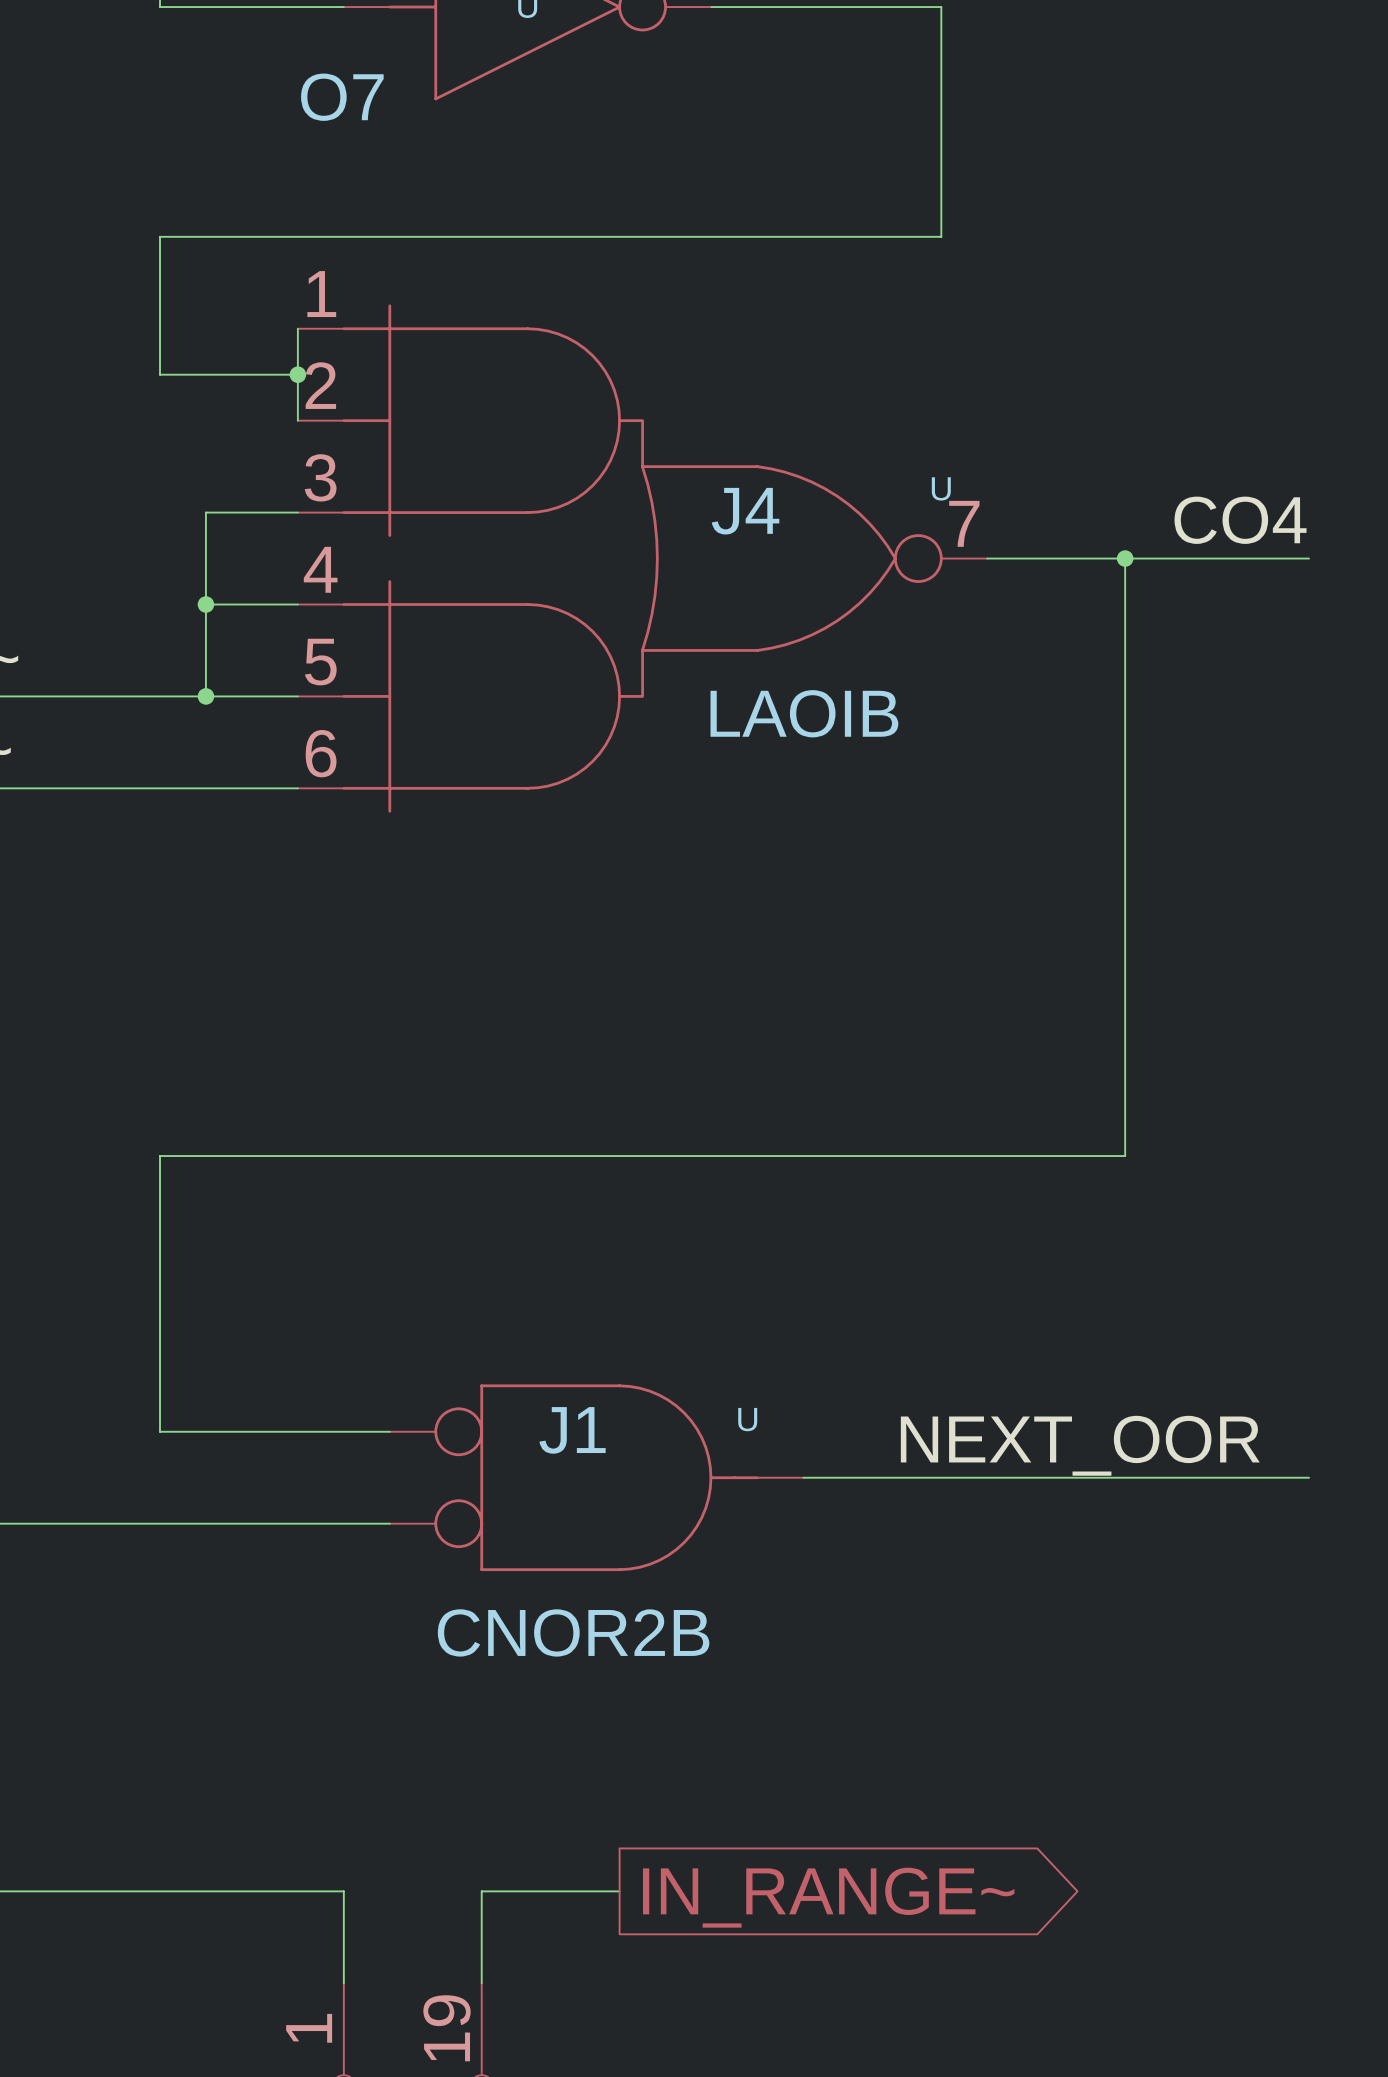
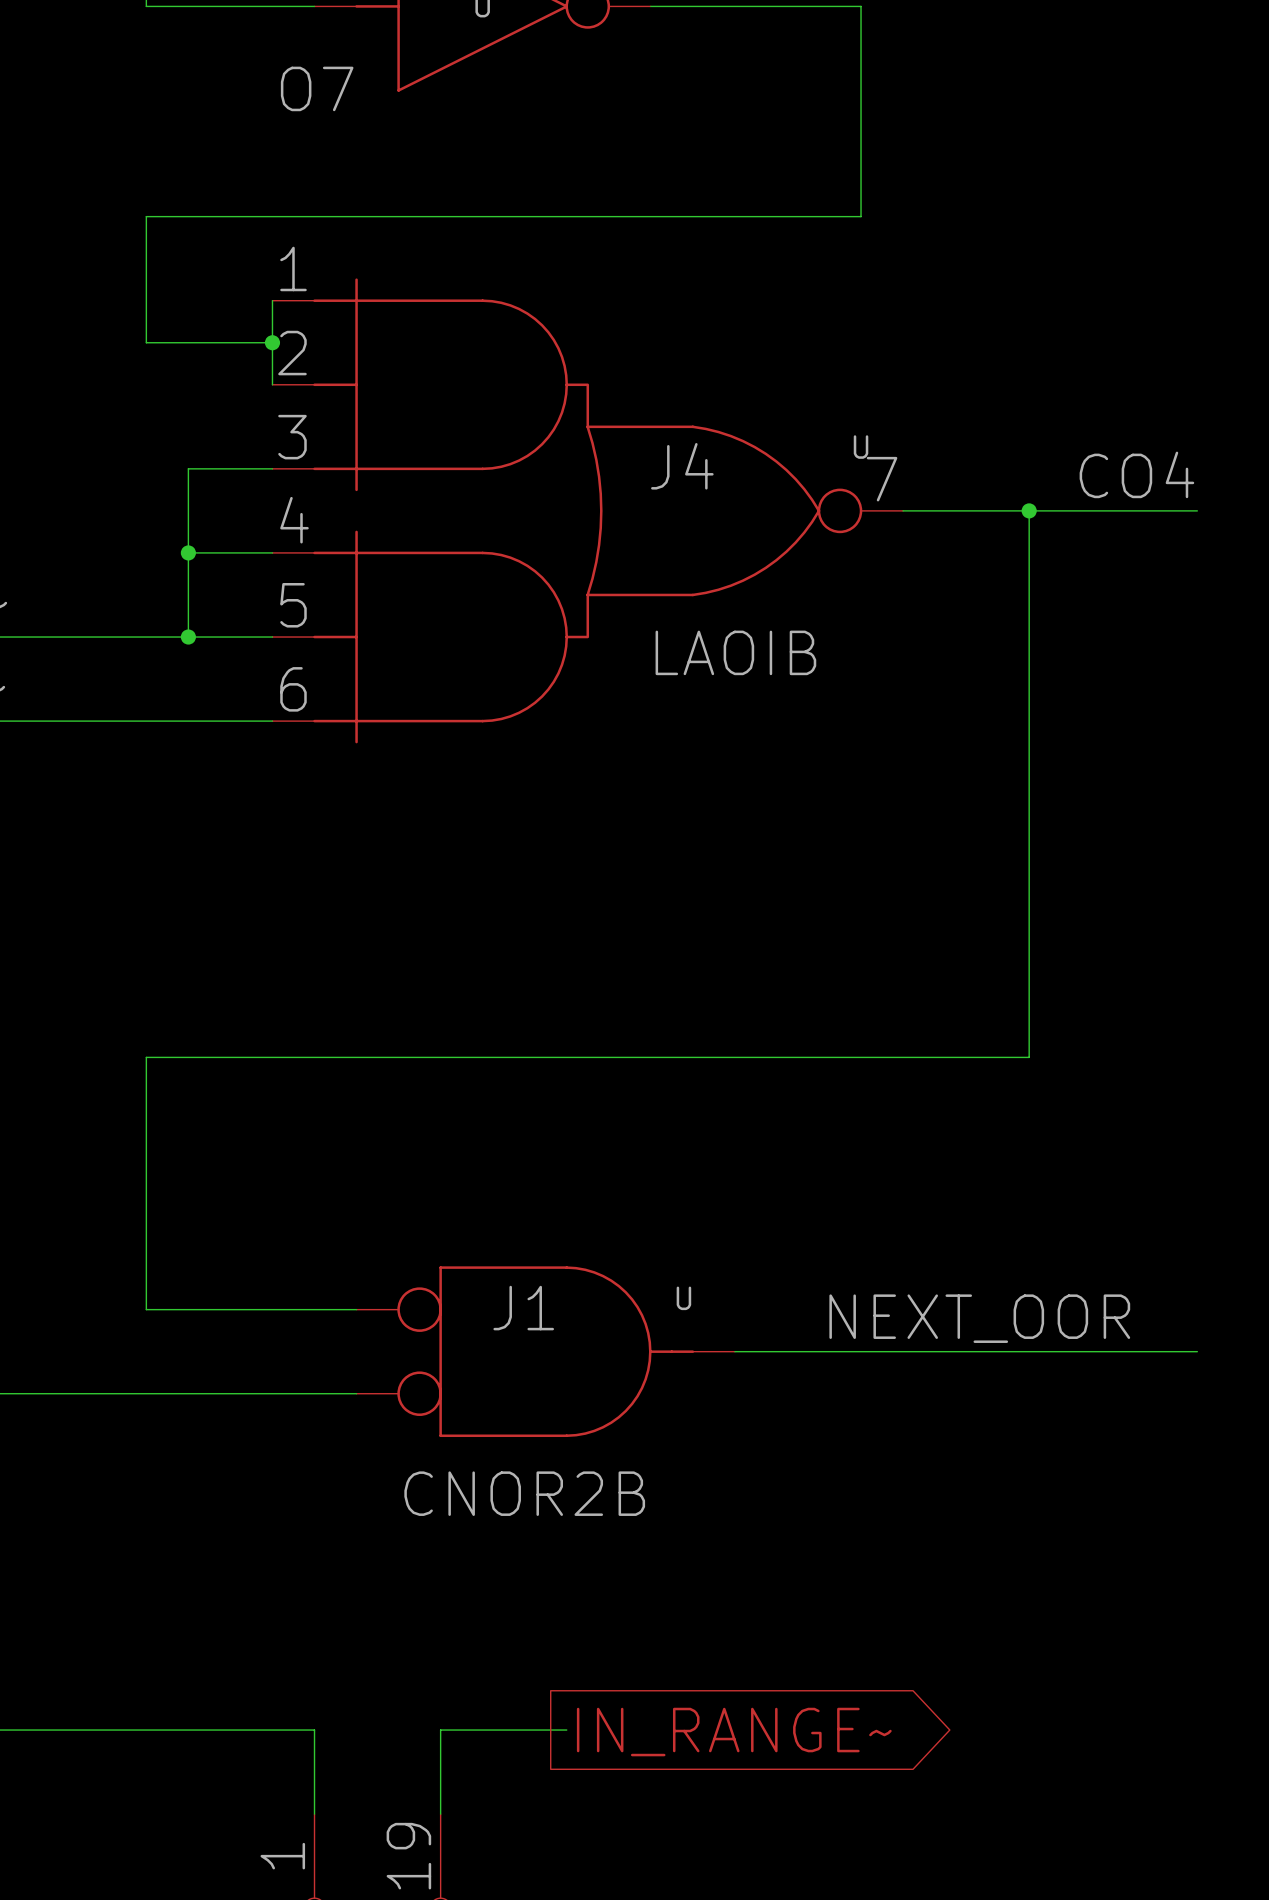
global label position: IN_RANGE~ (828, 1897) -> IN_RANGE~ (734, 1732)

